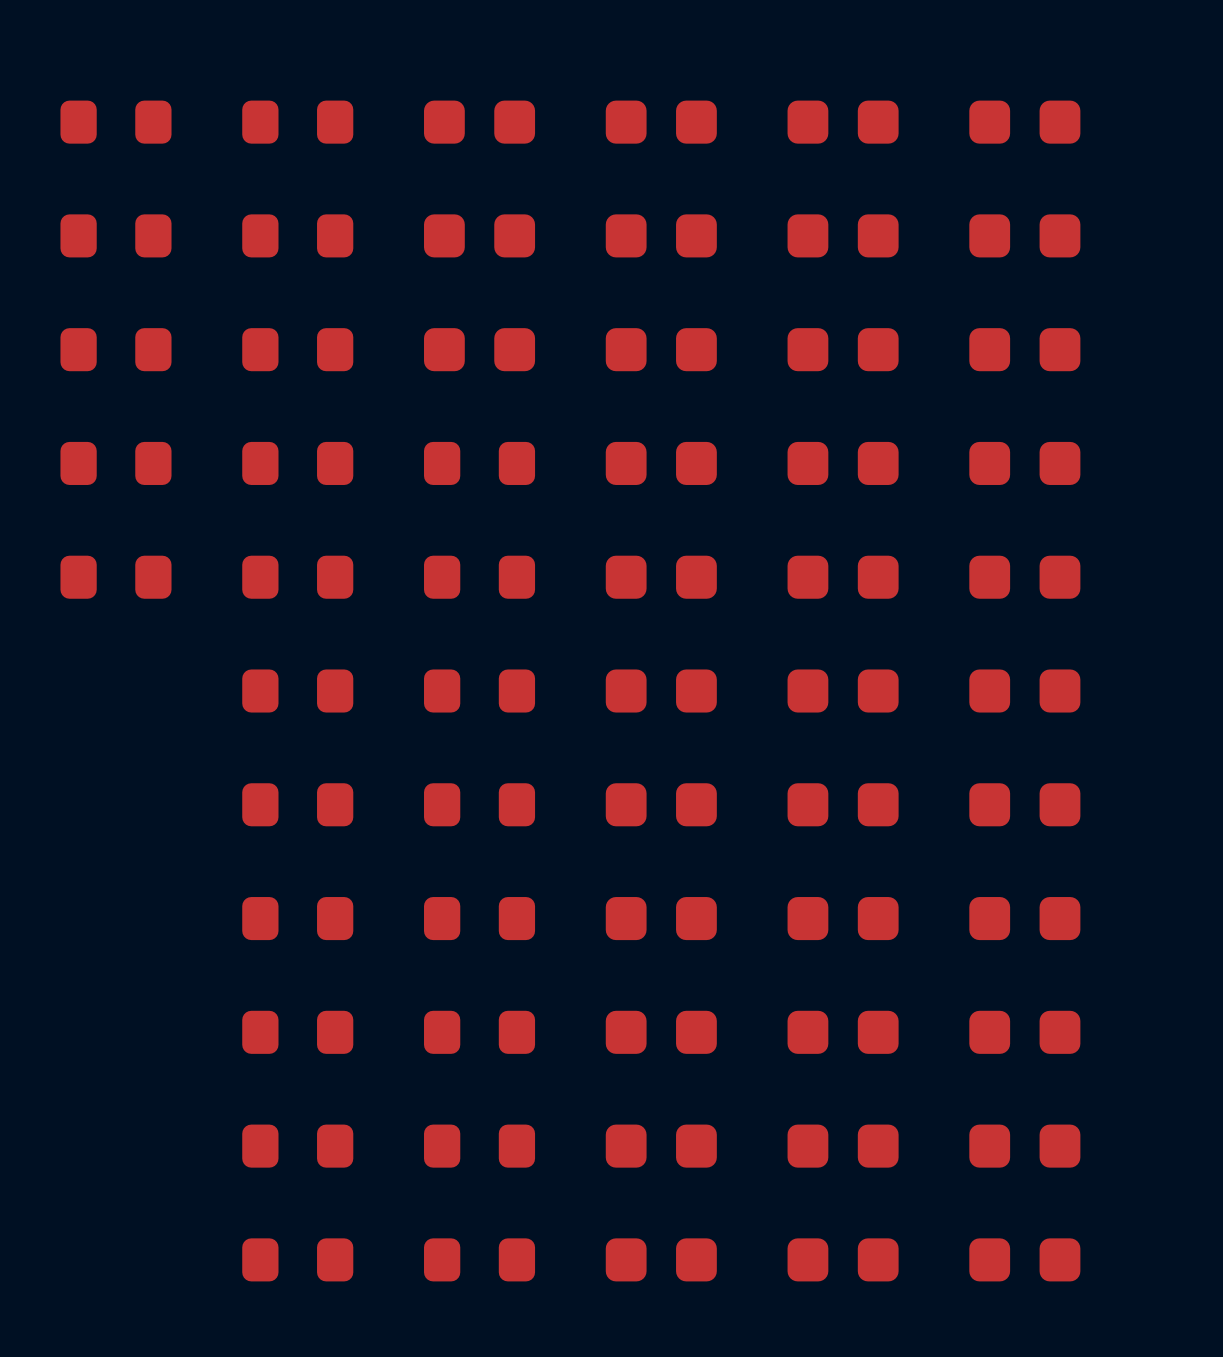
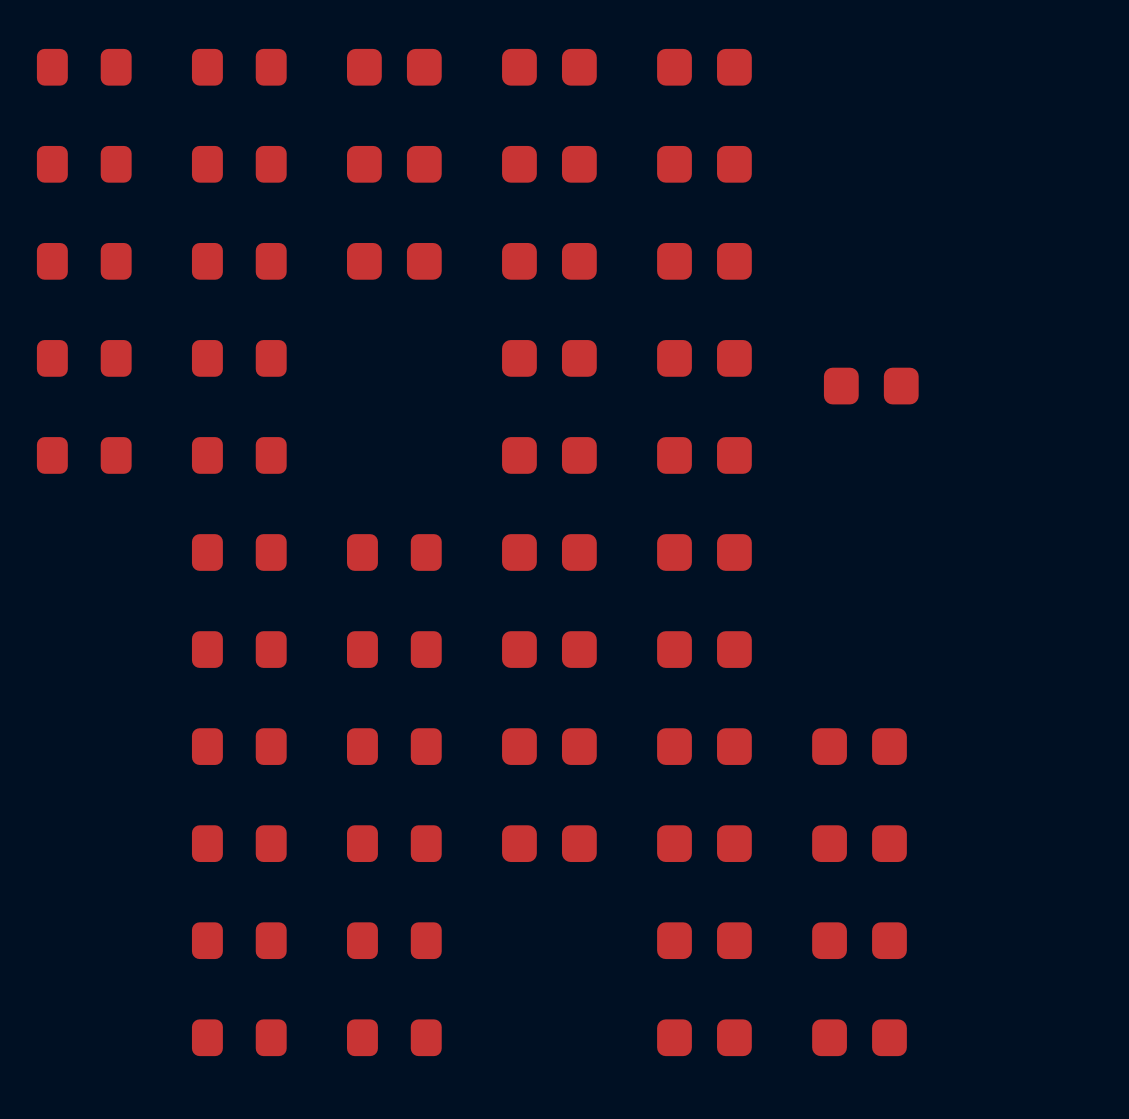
part: (1024, 122) -> none
part: (1024, 235) -> none
part: (1024, 349) -> none
part: (479, 463) -> none
part position: (1024, 463) -> (871, 386)
part: (479, 577) -> none
part: (1024, 577) -> none
part: (1024, 691) -> none
part: (1024, 804) -> none
part: (661, 1146) -> none
part: (661, 1259) -> none

